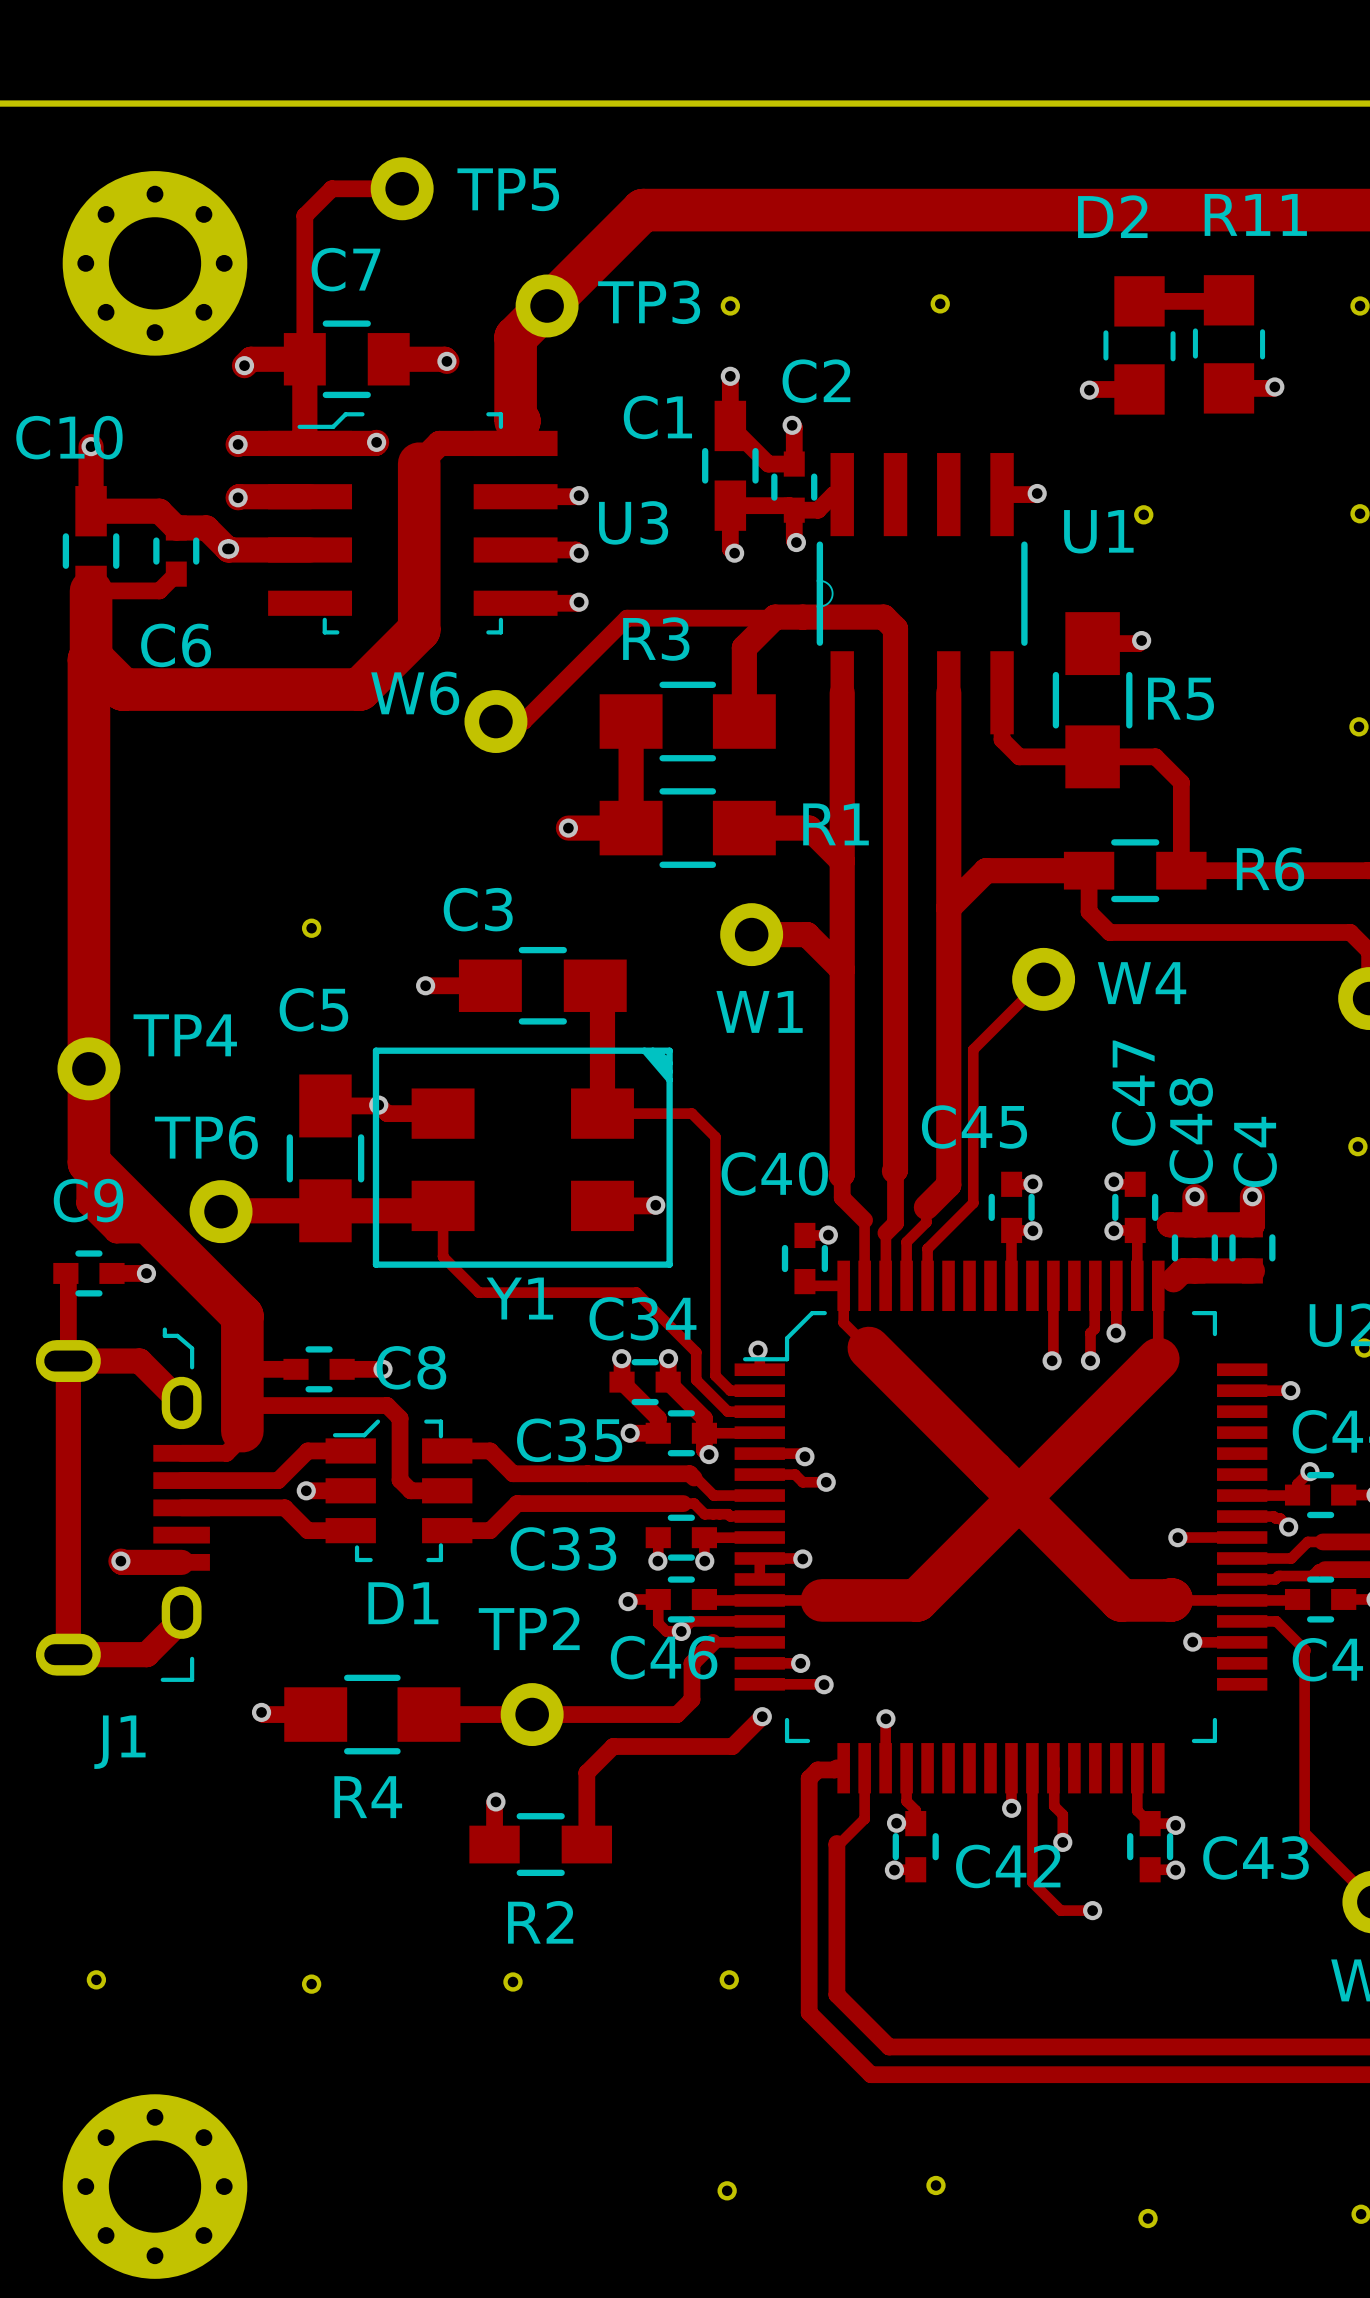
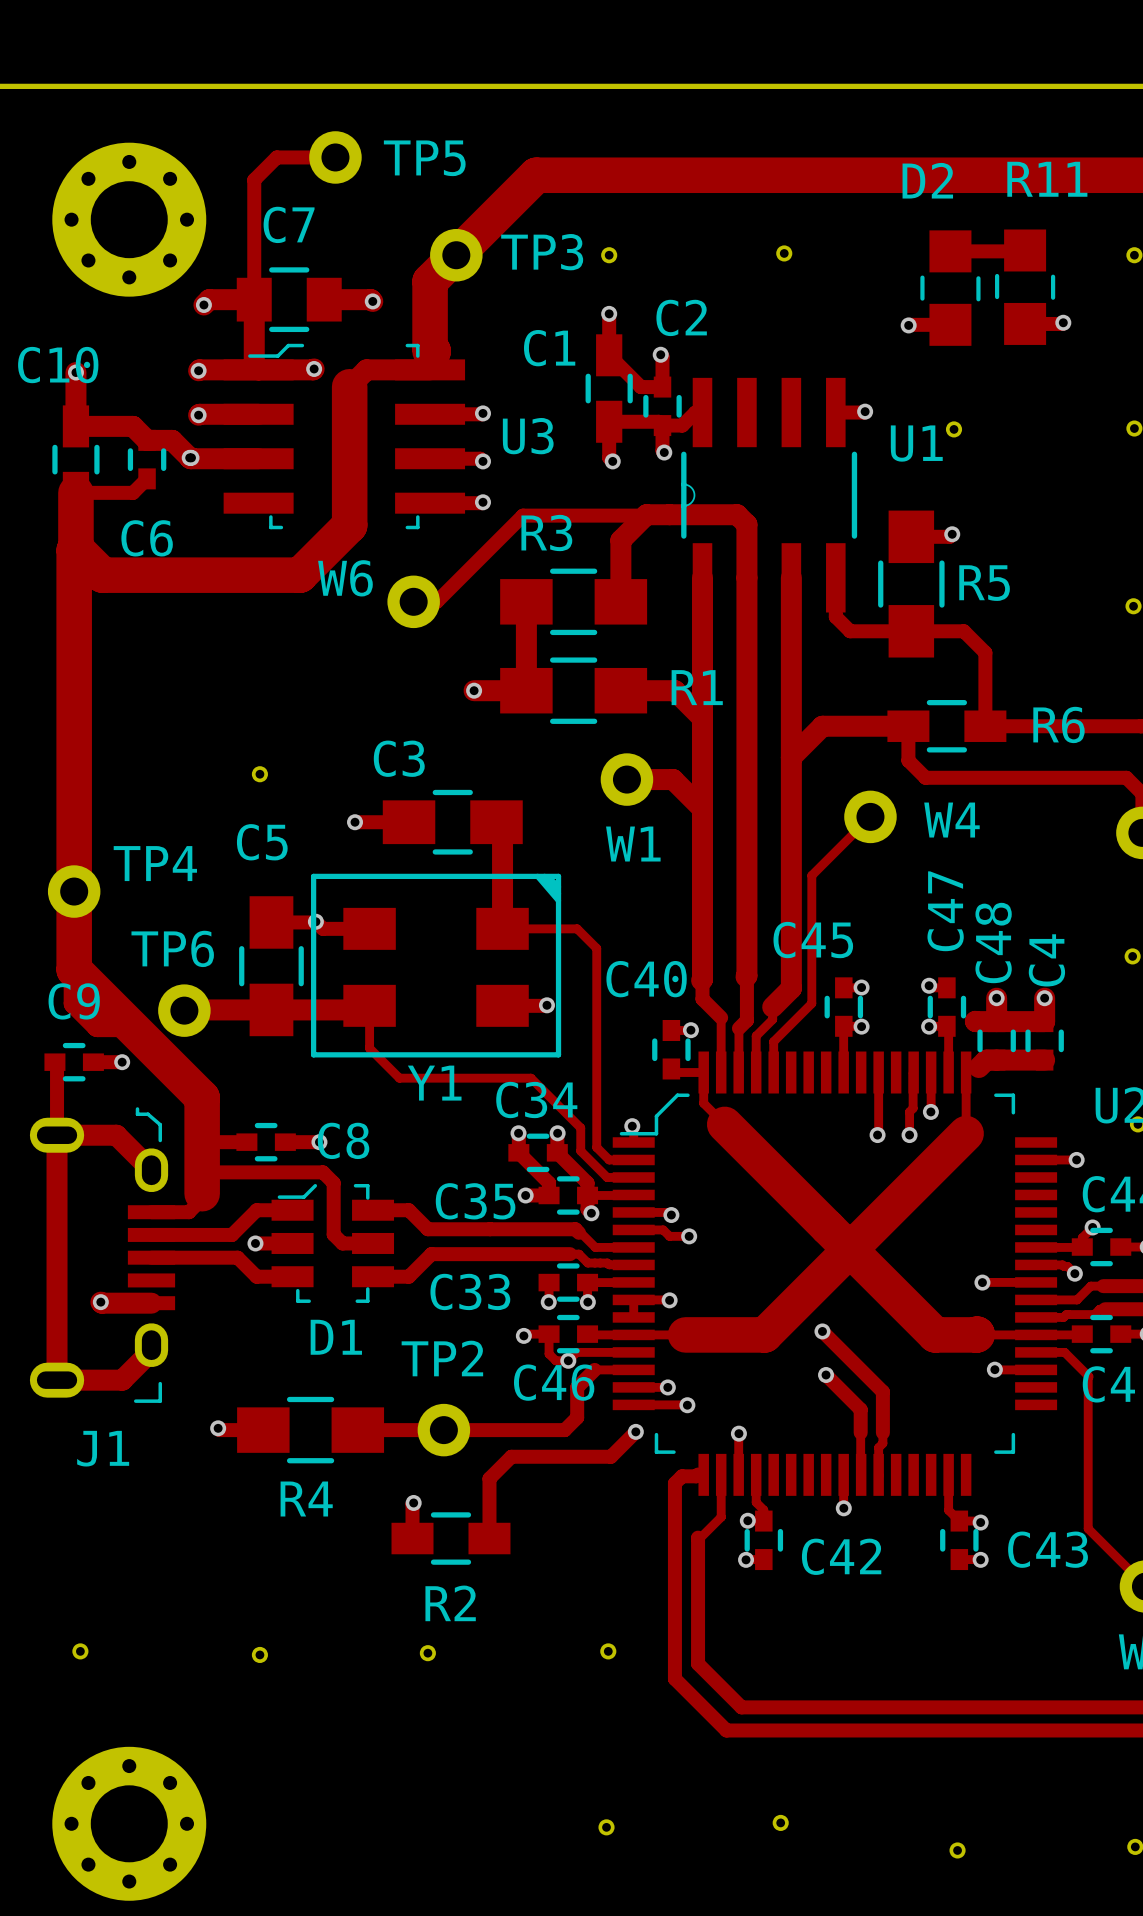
via: none -> (822, 1331)
via: none -> (826, 1375)
track: (1032, 1768) (1032, 1882) (1060, 1910) (1092, 1910) -> (860, 1474) (860, 1409) (826, 1375)
track: (1054, 1769) (1054, 1806) (1062, 1814) (1062, 1842) -> (878, 1474) (878, 1447) (882, 1443) (882, 1391) (822, 1331)
via: (1062, 1842) -> none
via: (1092, 1910) -> none

